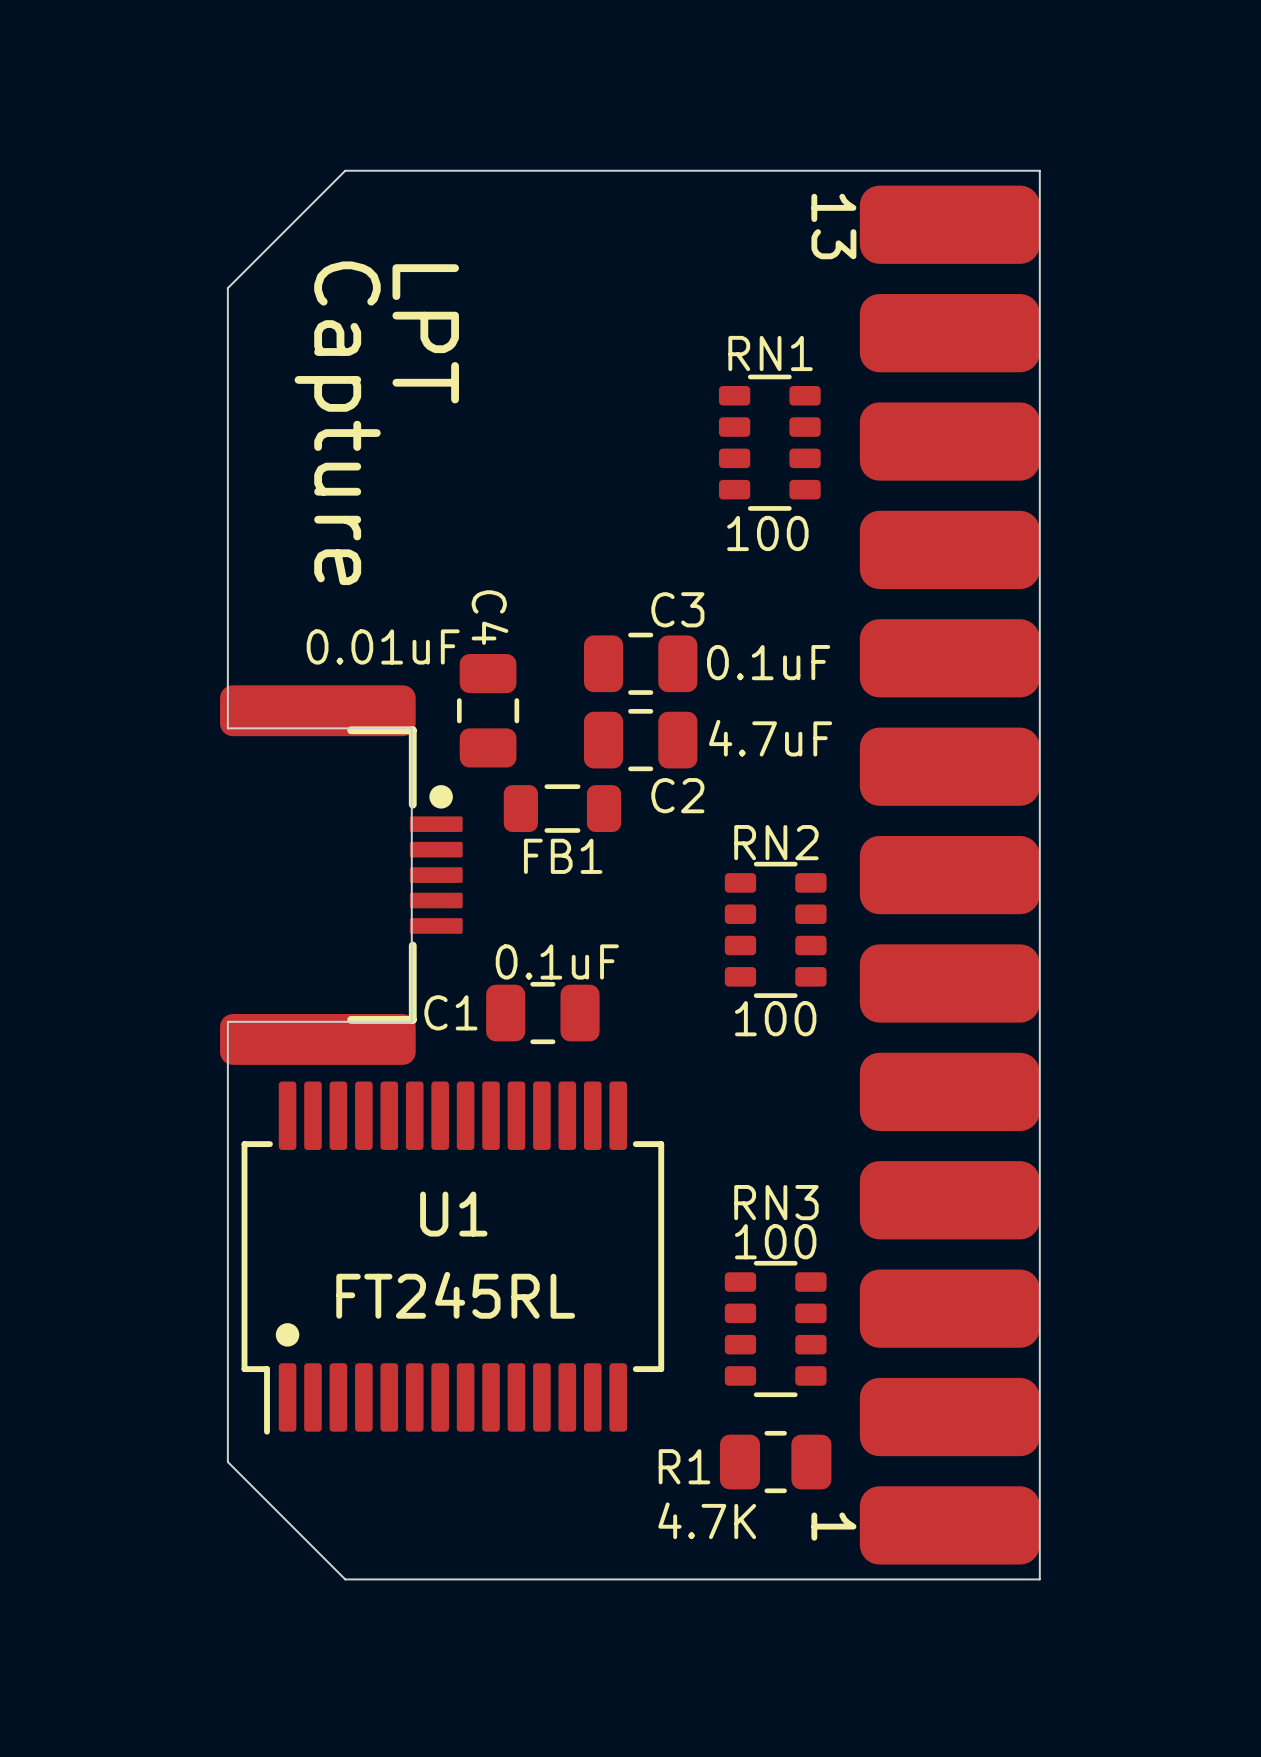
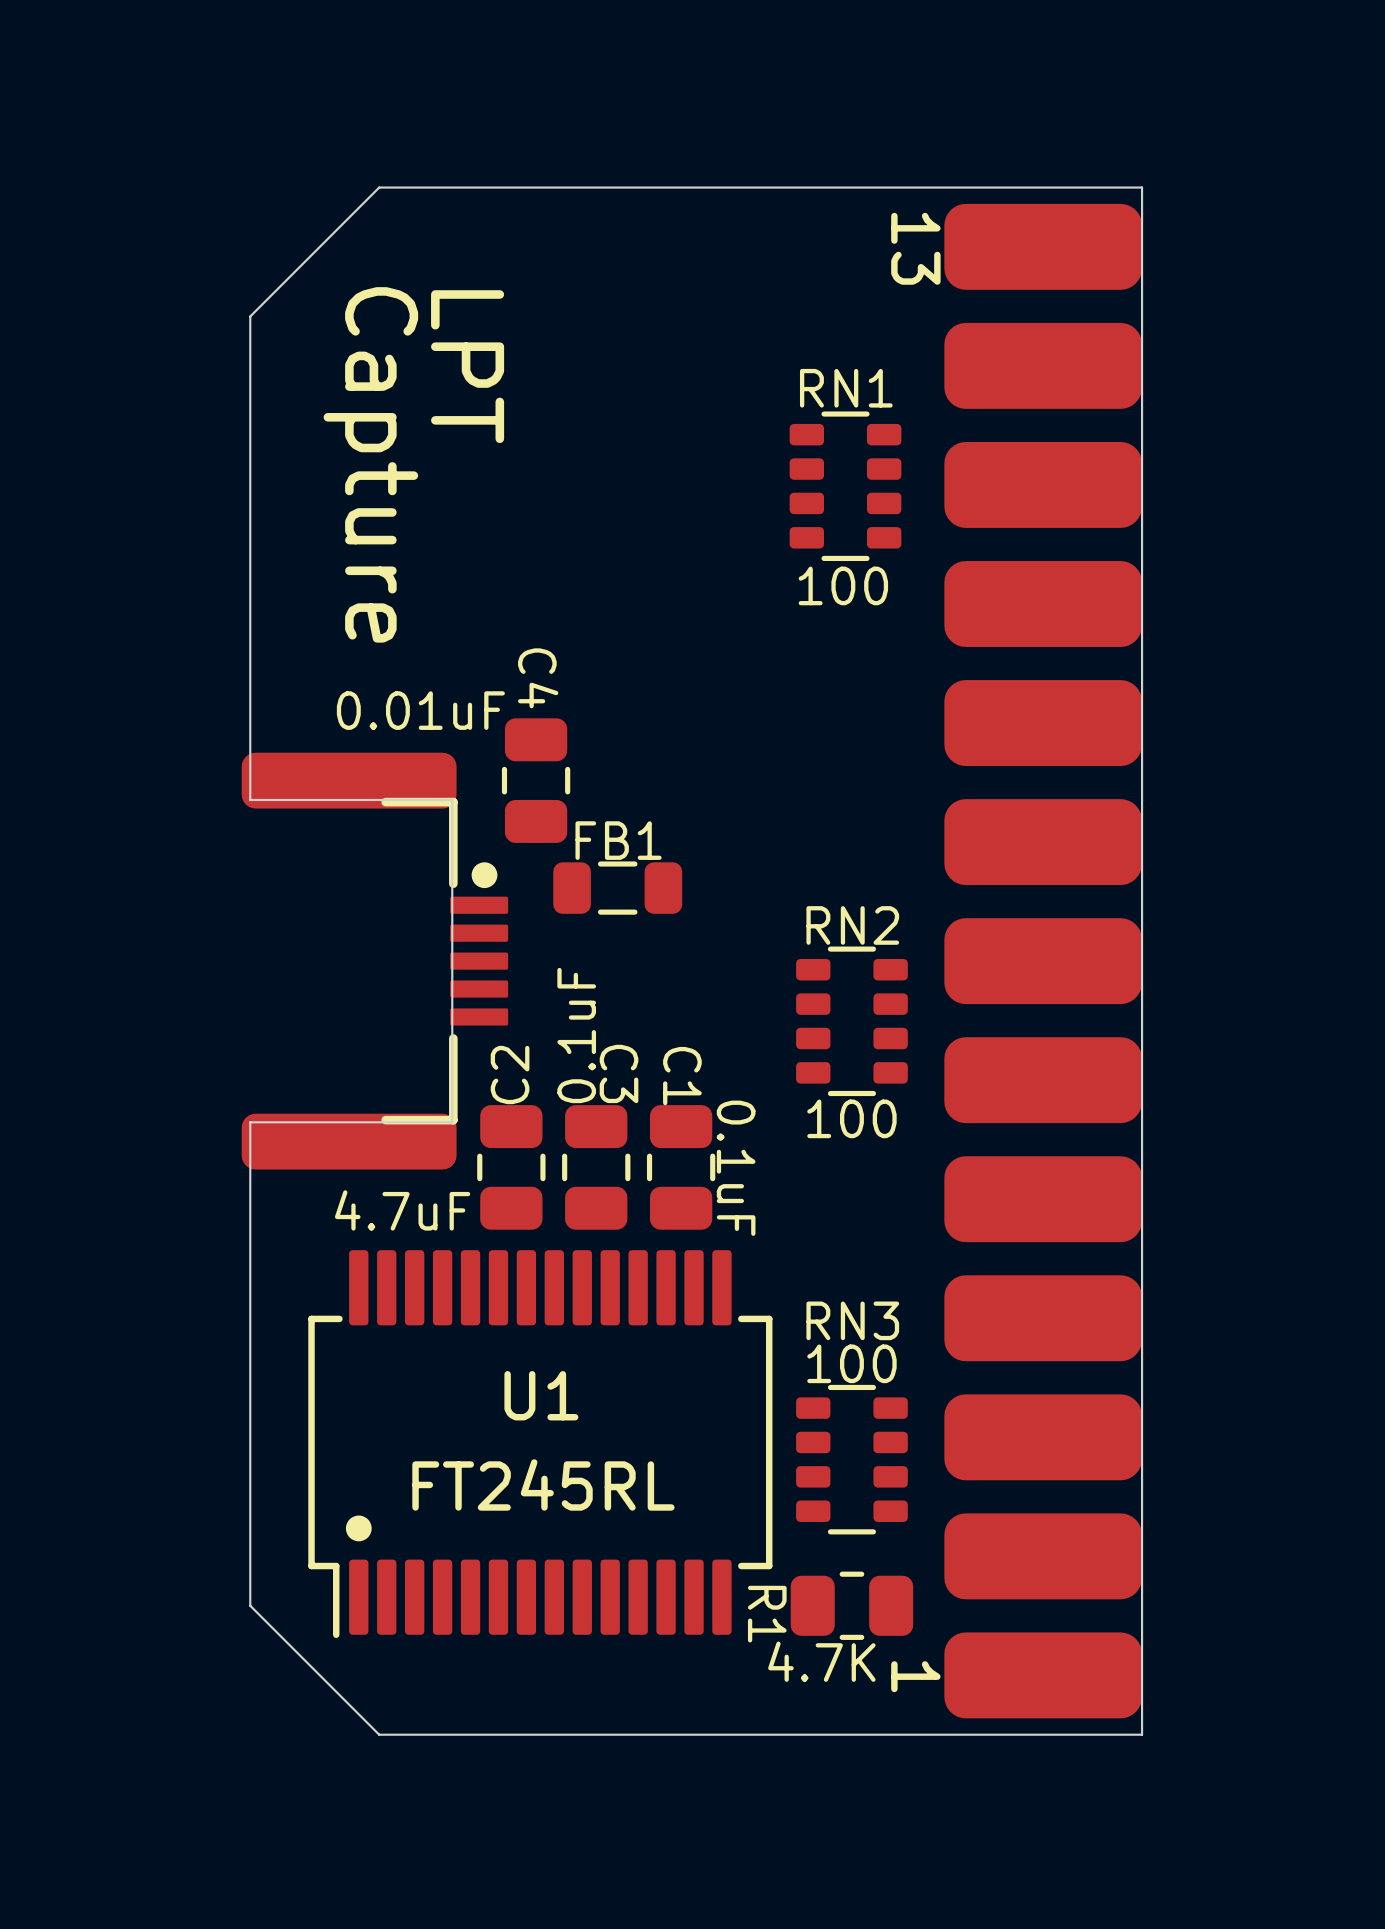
C3 value position: 0.1uF (768, 662) -> 0.1uF (576, 1035)
C3 rotation: 0° (640, 663) -> 90° clockwise (596, 1167)
C3 position: (640, 663) -> (596, 1167)
C2 value position: 4.7uF (770, 738) -> 4.7uF (402, 1210)
C2 rotation: 0° (640, 740) -> 90° clockwise (511, 1167)
C2 position: (640, 740) -> (511, 1167)
C2 name position: C2 (677, 795) -> C2 (510, 1075)
FB1 name position: FB1 (563, 856) -> FB1 (618, 840)
C1 rotation: 0° (542, 1013) -> 90° clockwise (681, 1167)
C1 position: (542, 1013) -> (681, 1167)
U1 position: (452, 1258) -> (540, 1444)
R1 name rotation: 0° (684, 1466) -> 90° clockwise (767, 1614)
R1 value position: 4.7K (707, 1520) -> 4.7K (821, 1661)

